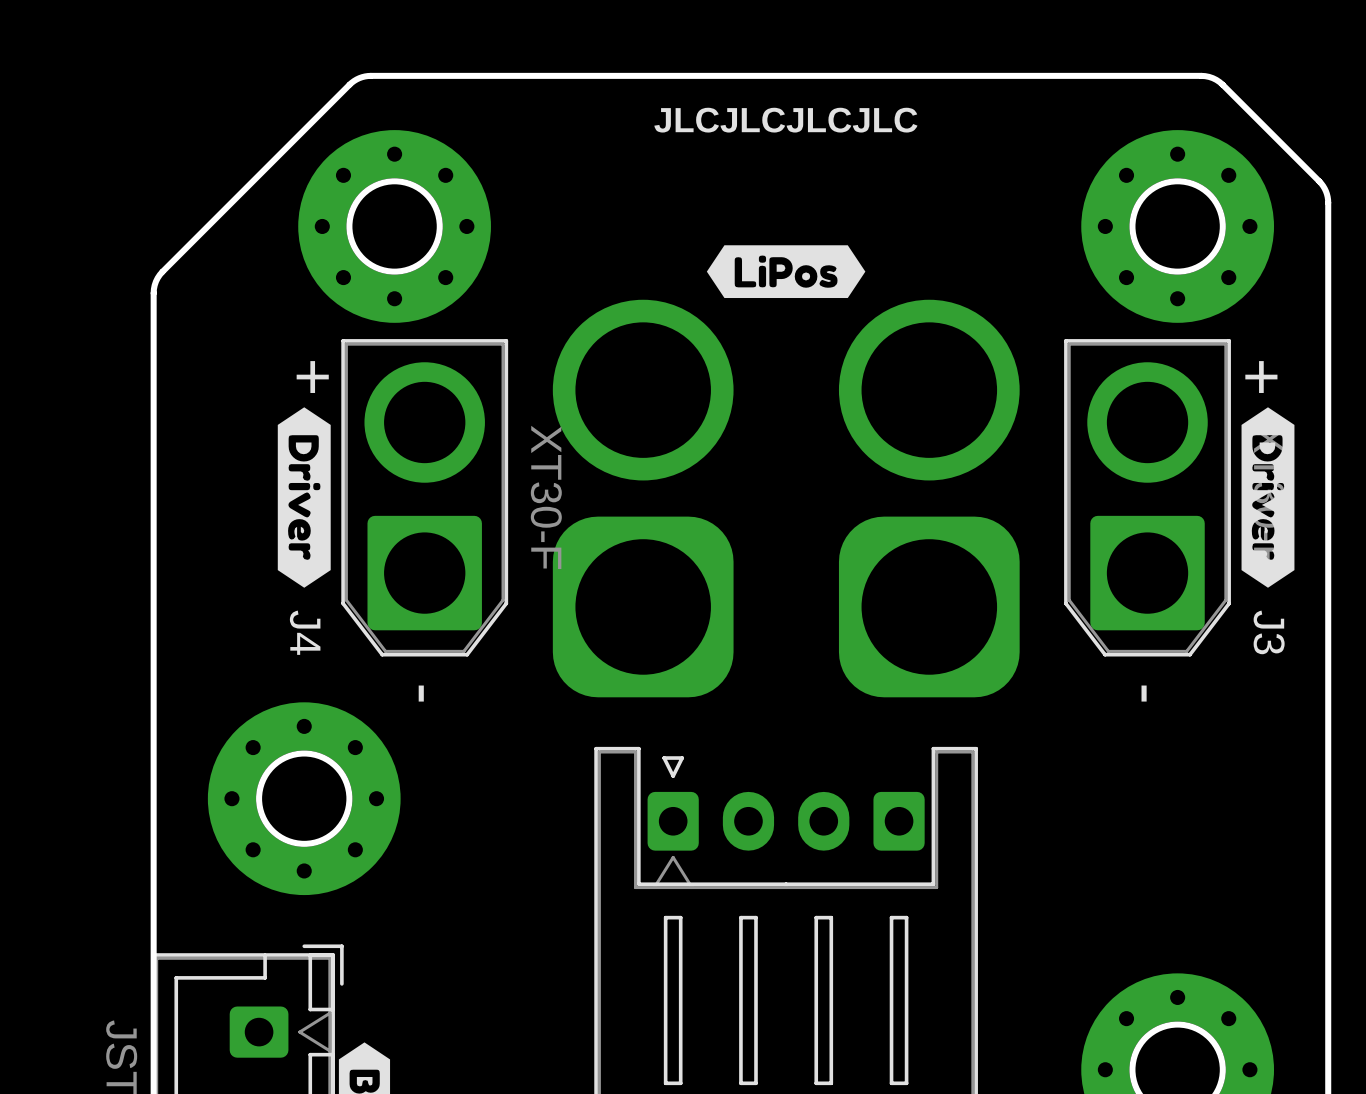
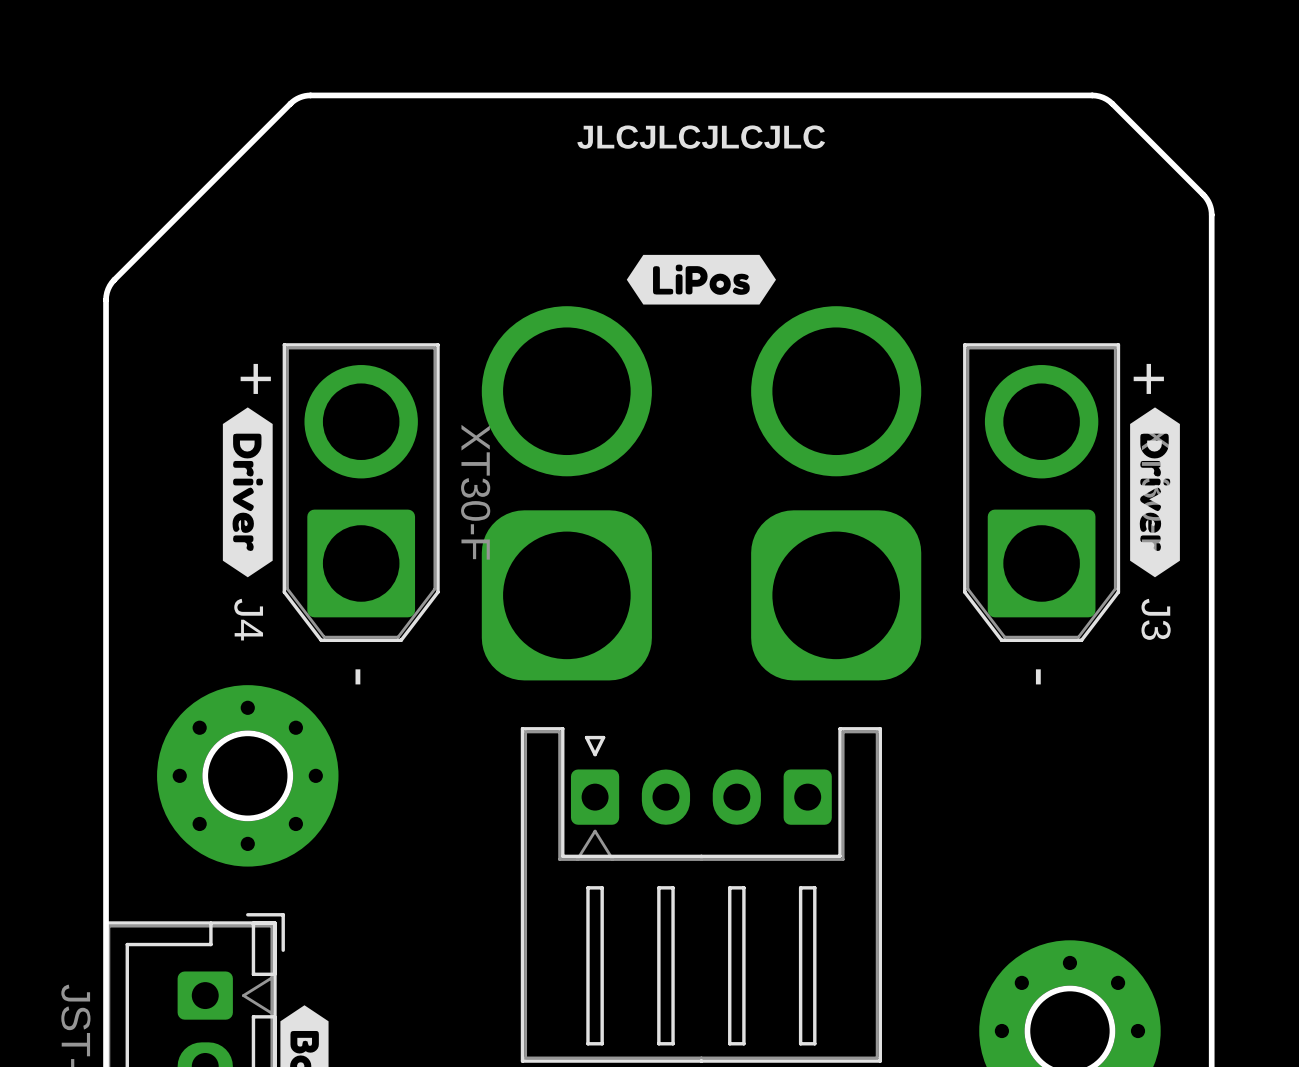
round board edge: [346, 178, 443, 275] -> none
round board edge: [1129, 178, 1226, 275] -> none
part: (394, 226) -> none
part: (1177, 226) -> none

